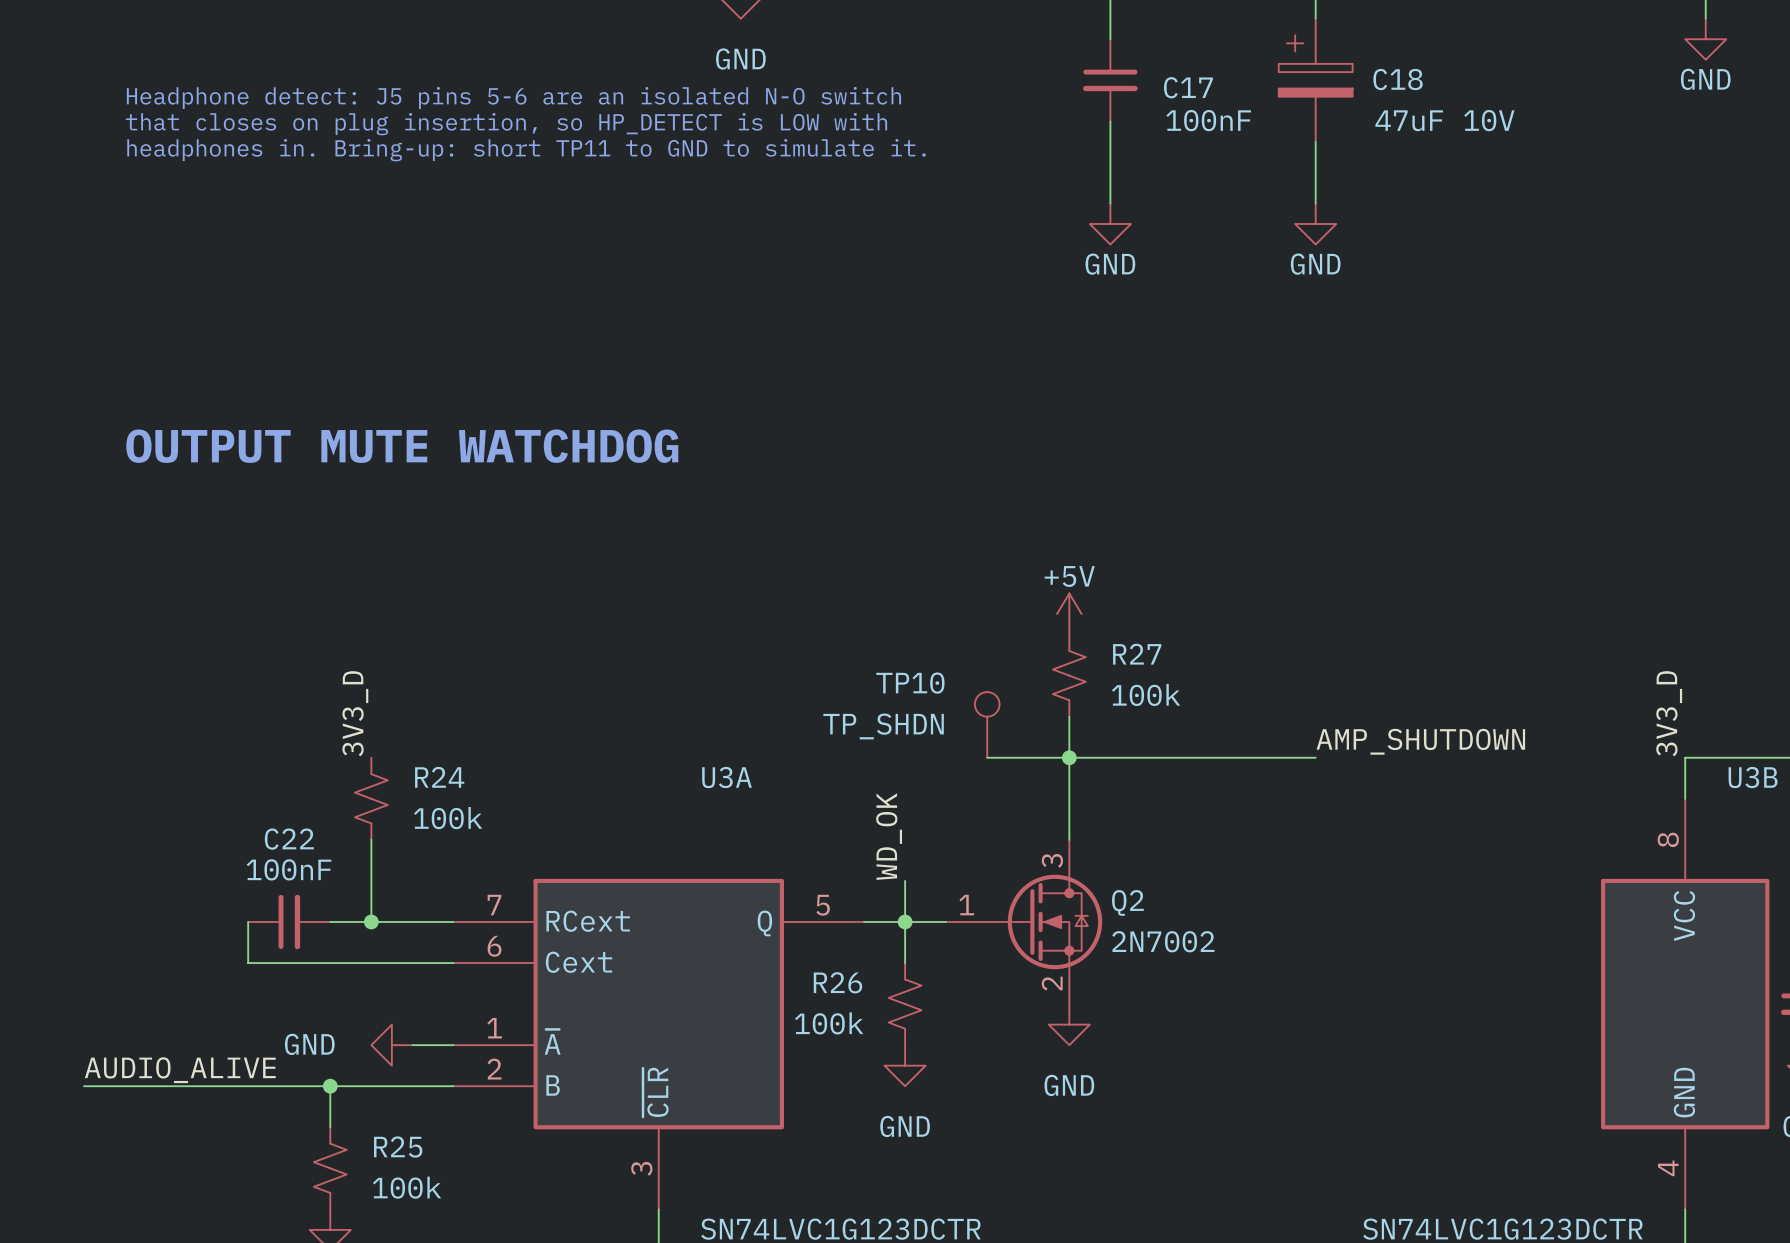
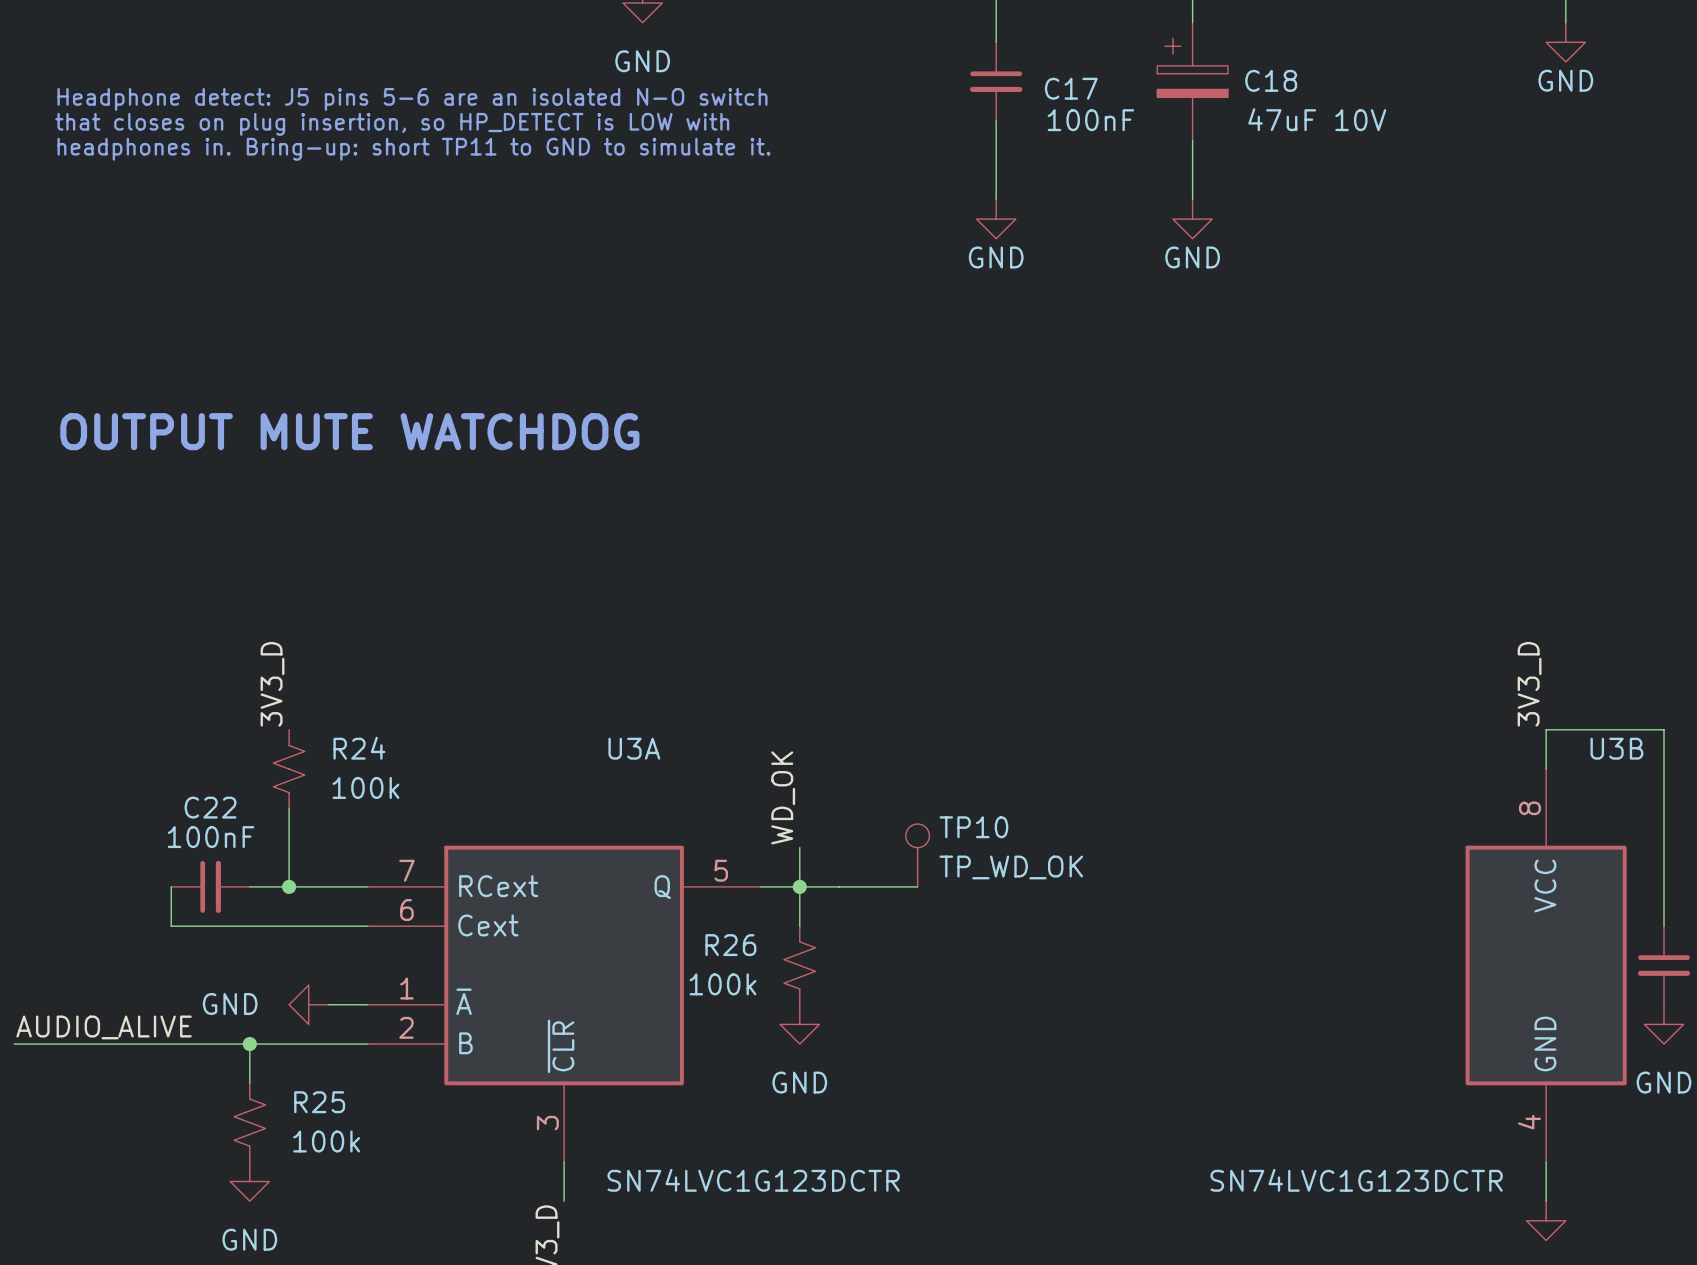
power symbol: +5V (1069, 614) -> none
R27: 100k (1069, 675) -> none
TP10 name position: TP10 (910, 683) -> TP10 (973, 827)
wire: (1069, 716) (1069, 839) -> none
TP10 position: (987, 724) -> (917, 855)
TP10 value: TP_SHDN (883, 726) -> TP_WD_OK (1011, 867)
label: AMP_SHUTDOWN (1420, 741) -> none
wire: (987, 757) (1315, 757) -> none
junction: (1069, 757) -> none
Q2: 2N7002 (1024, 921) -> none
power symbol: GND (1069, 1024) -> none

